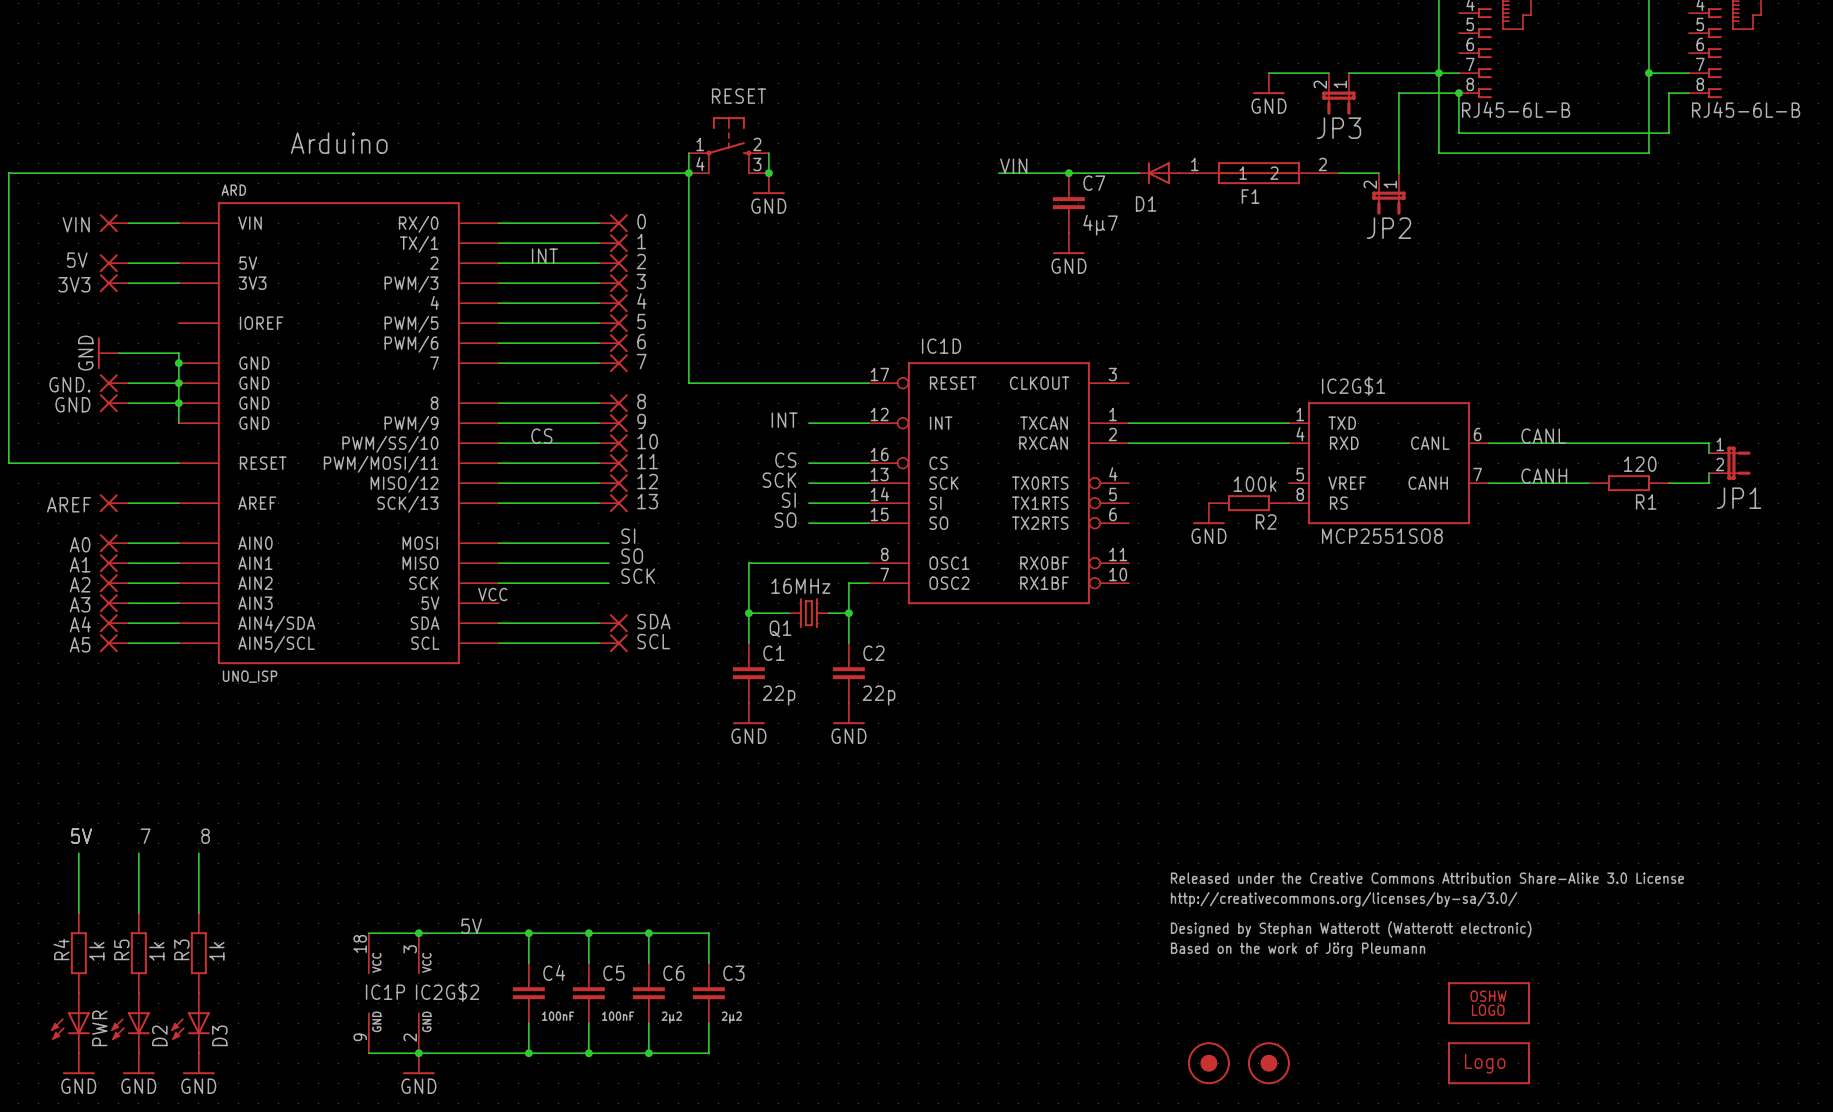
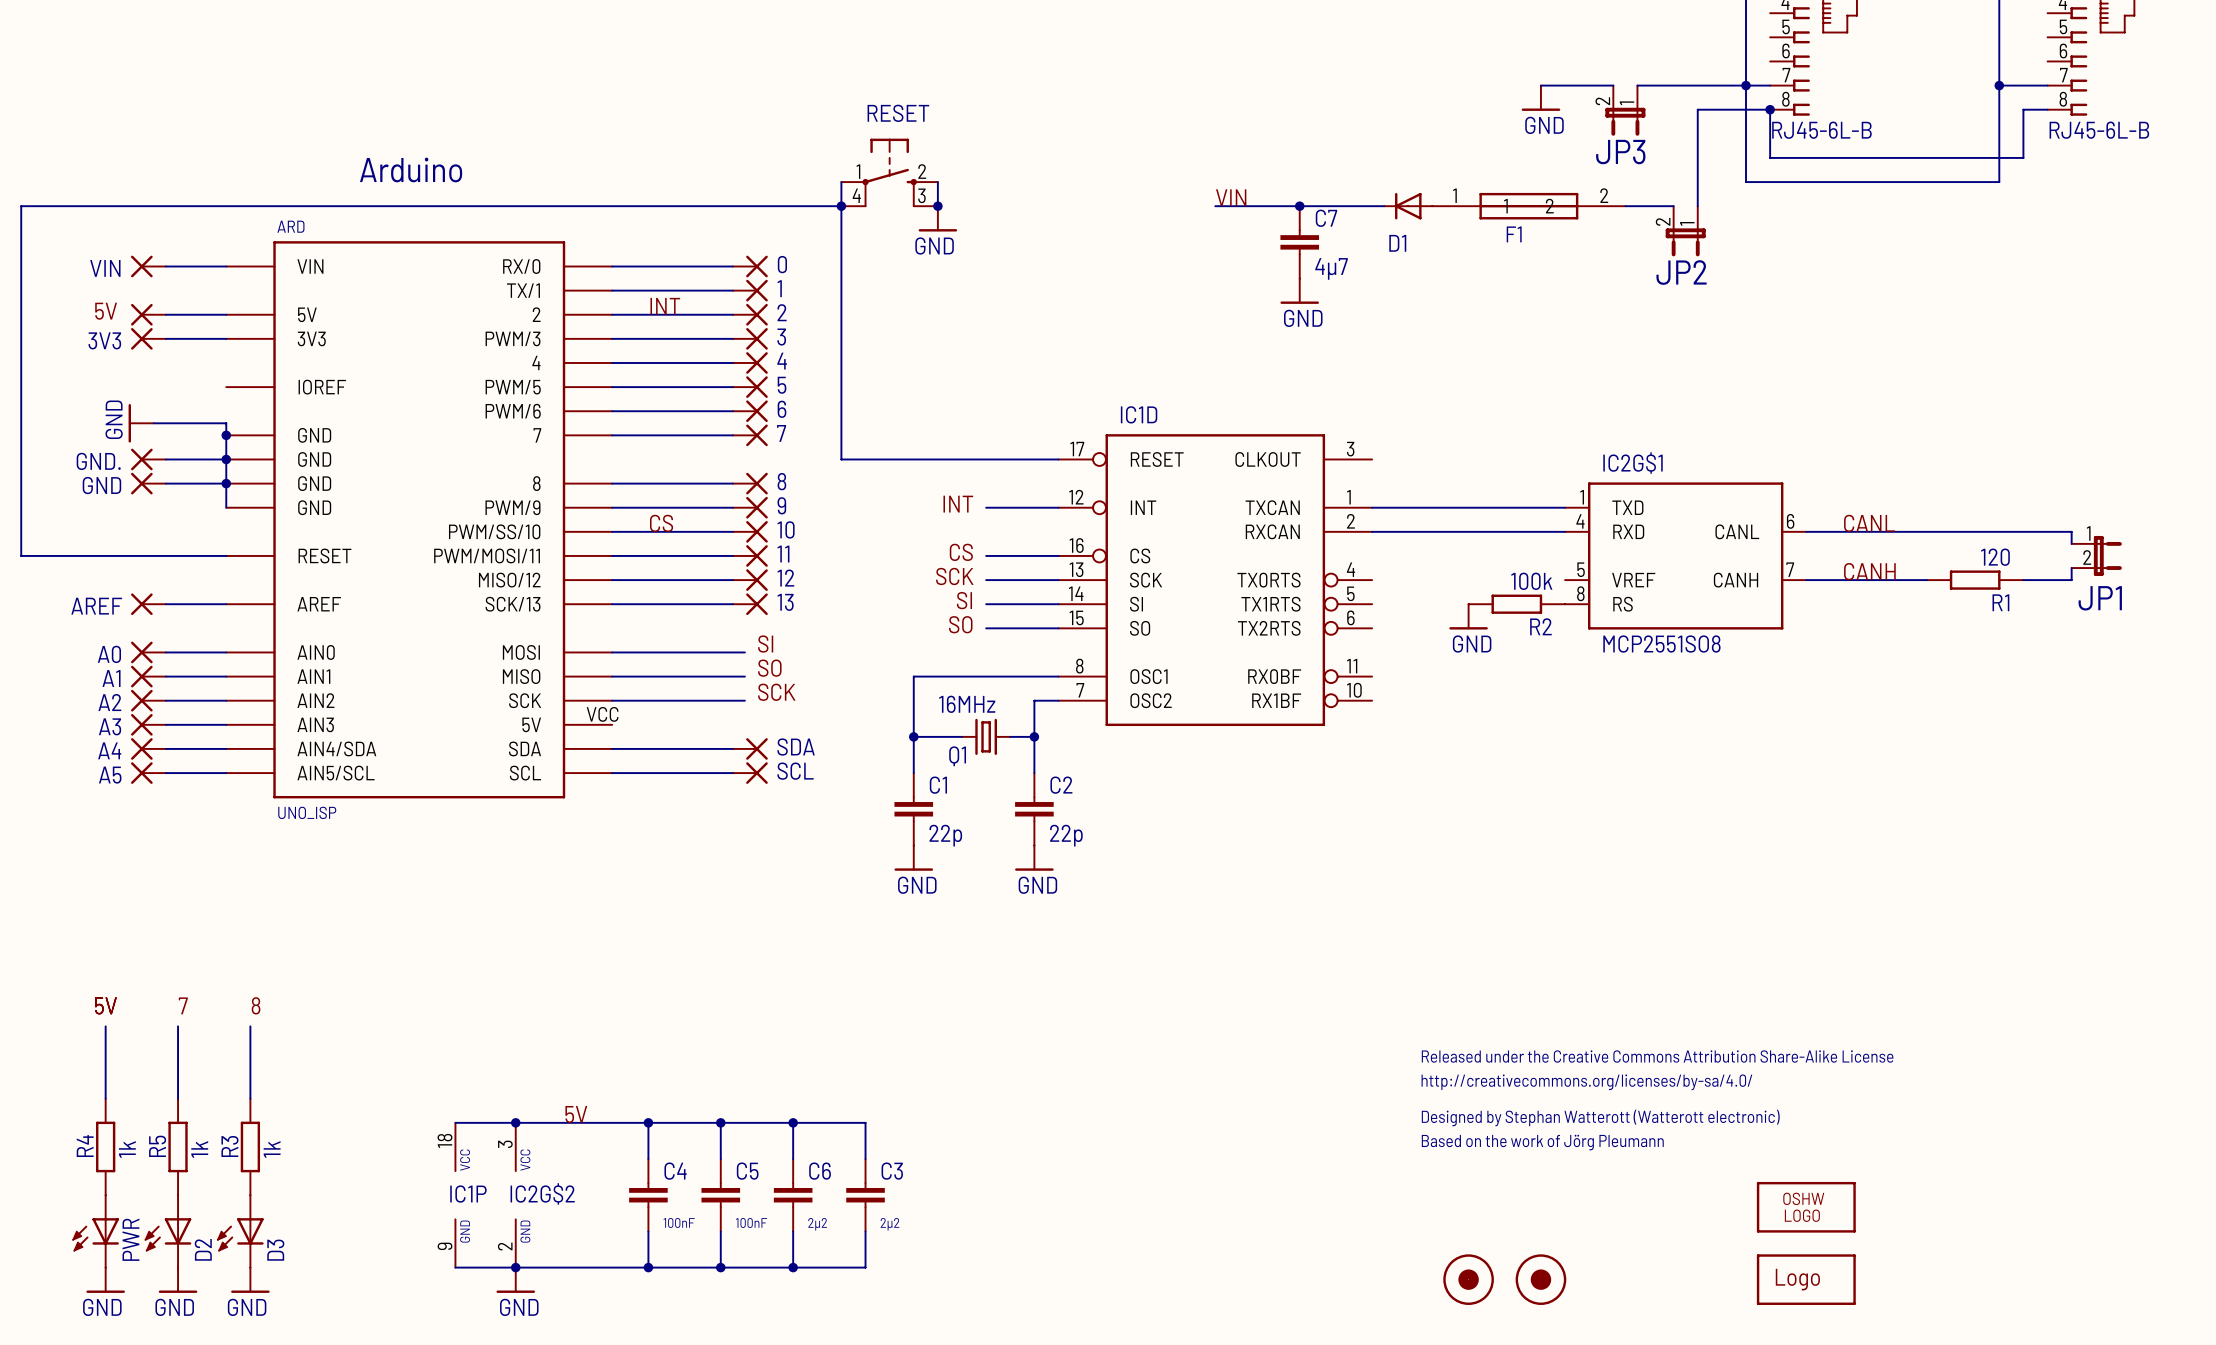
text: Released under the Creative Commons Attribution Share-Alike 3.0 License (1427, 878) -> Released under the Creative Commons Attribution Share-Alike License (1657, 1056)
text: http://creativecommons.org/licenses/by-sa/3.0/ (1344, 899) -> http://creativecommons.org/licenses/by-sa/4.0/ (1586, 1082)

